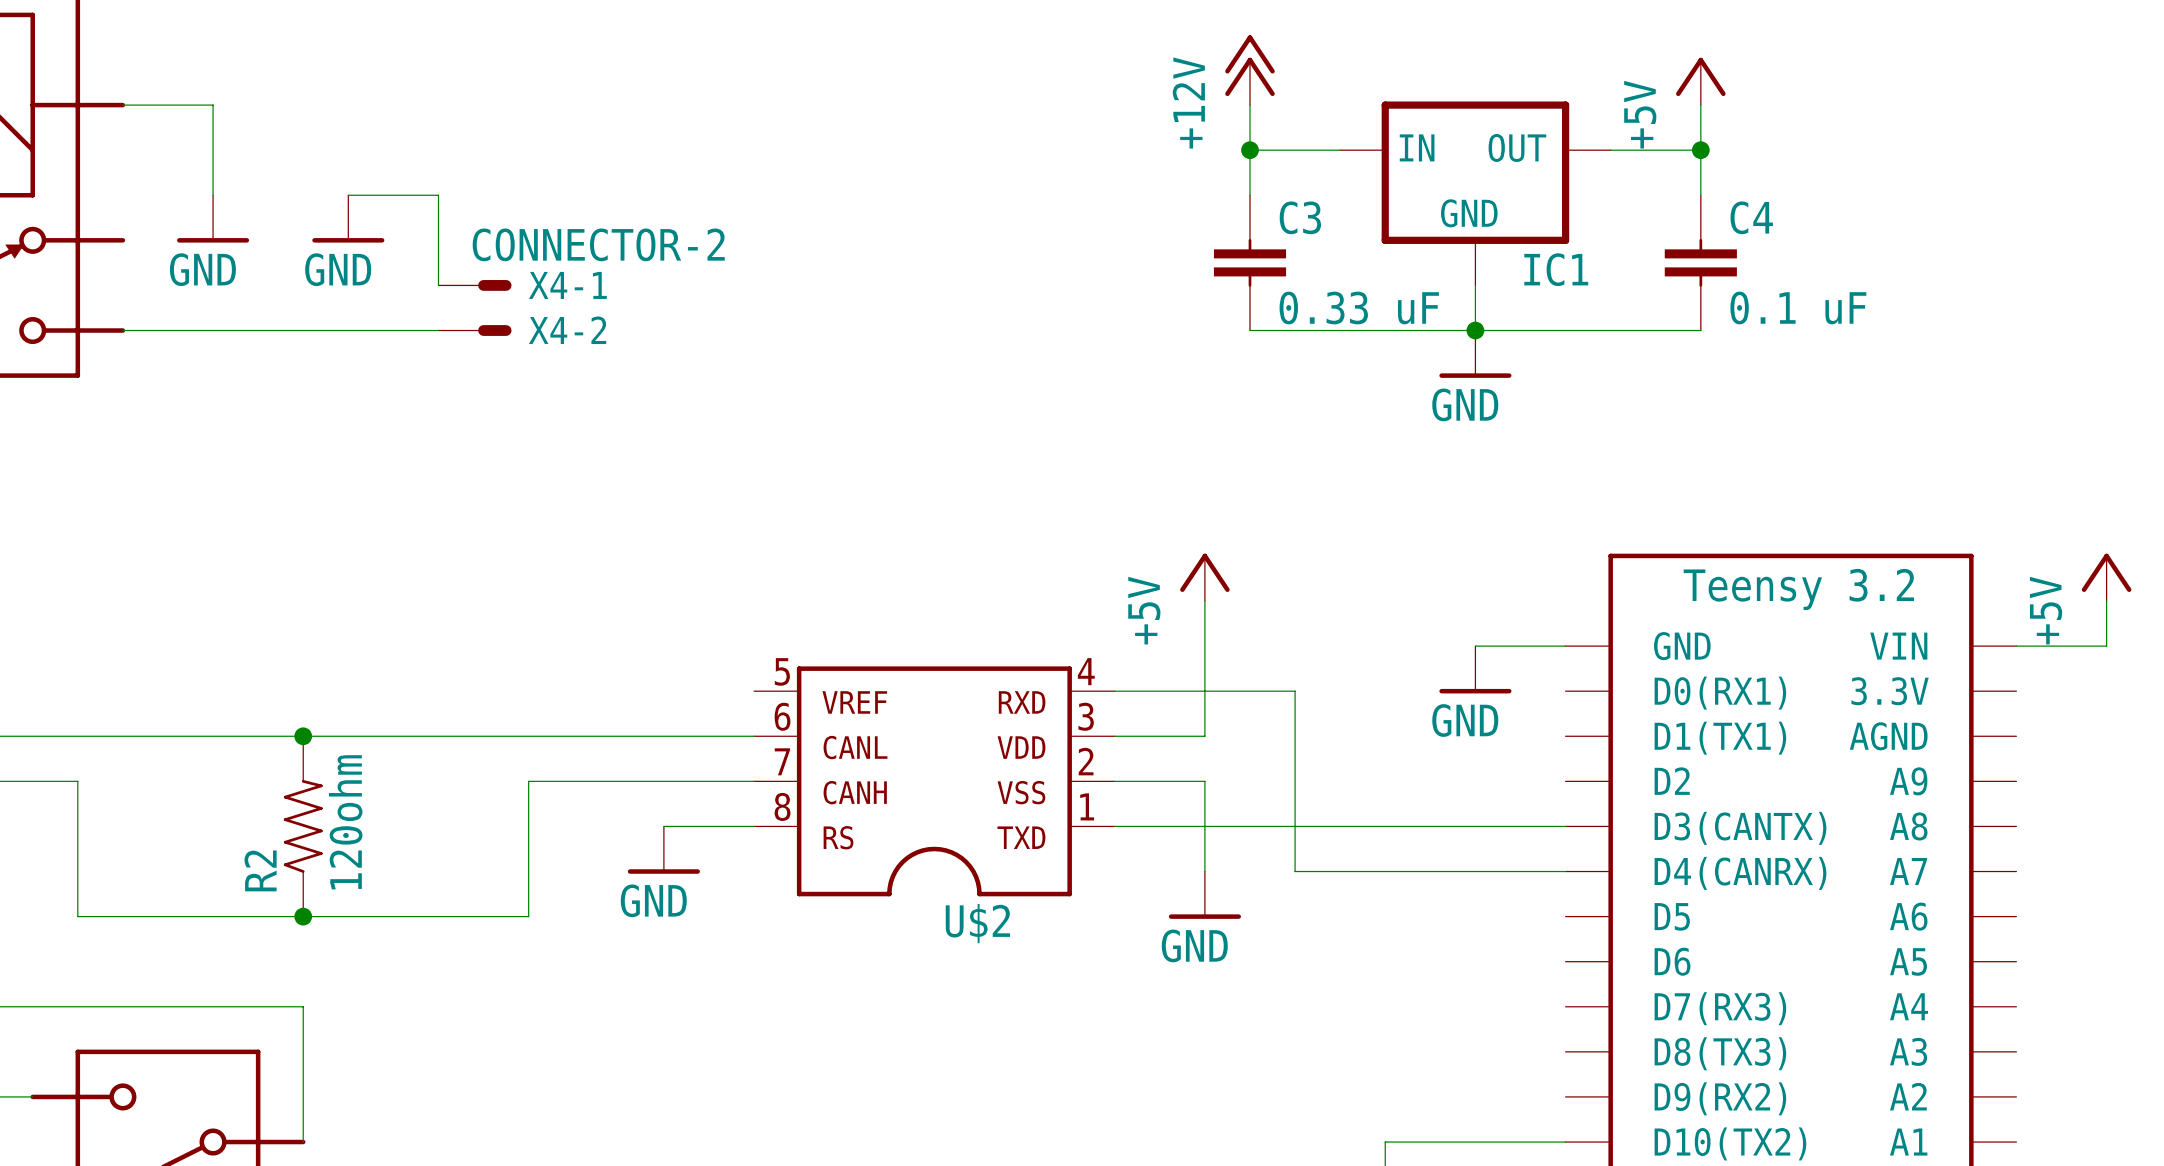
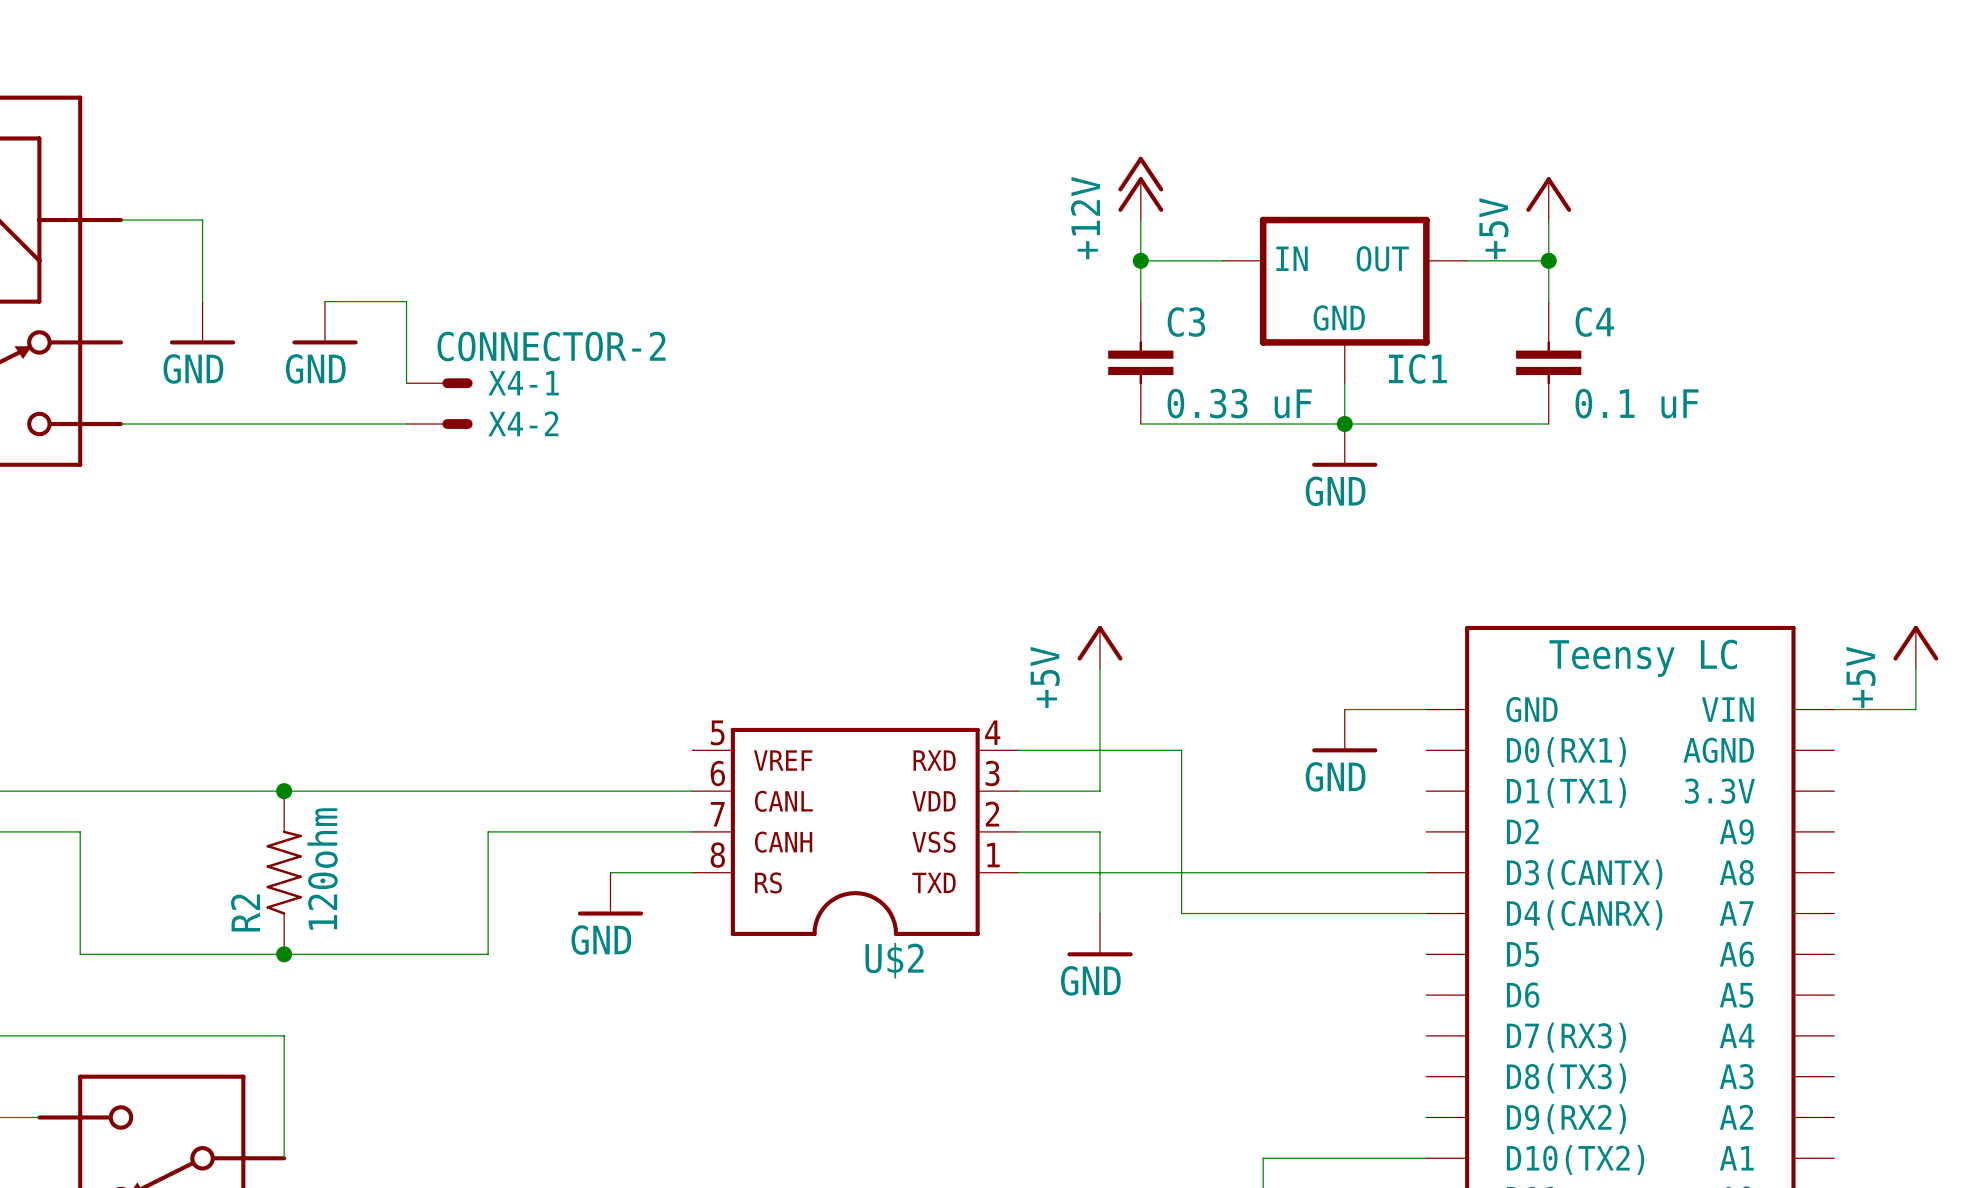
part text: Teensy 3.2 (1798, 589) -> none
part text: none -> Teensy LC (1643, 658)
part pin name: 3.3V (1890, 691) -> AGND (1718, 750)
part pin name: AGND (1888, 736) -> 3.3V (1719, 791)

